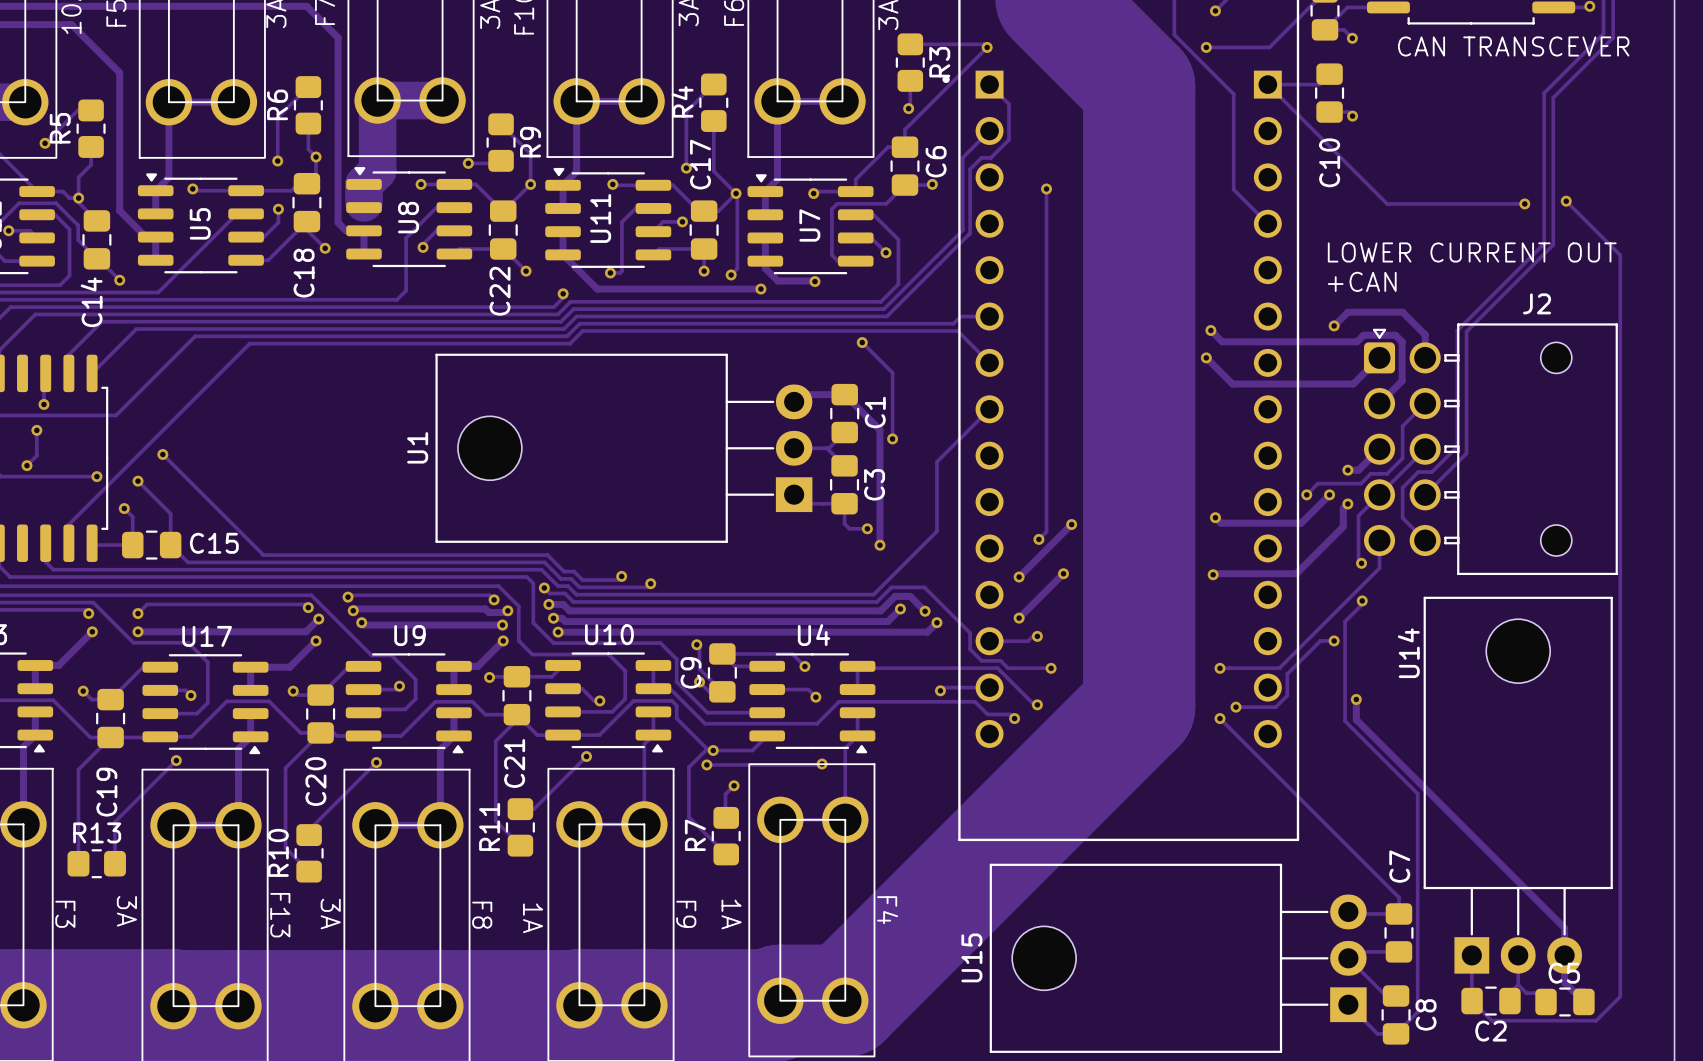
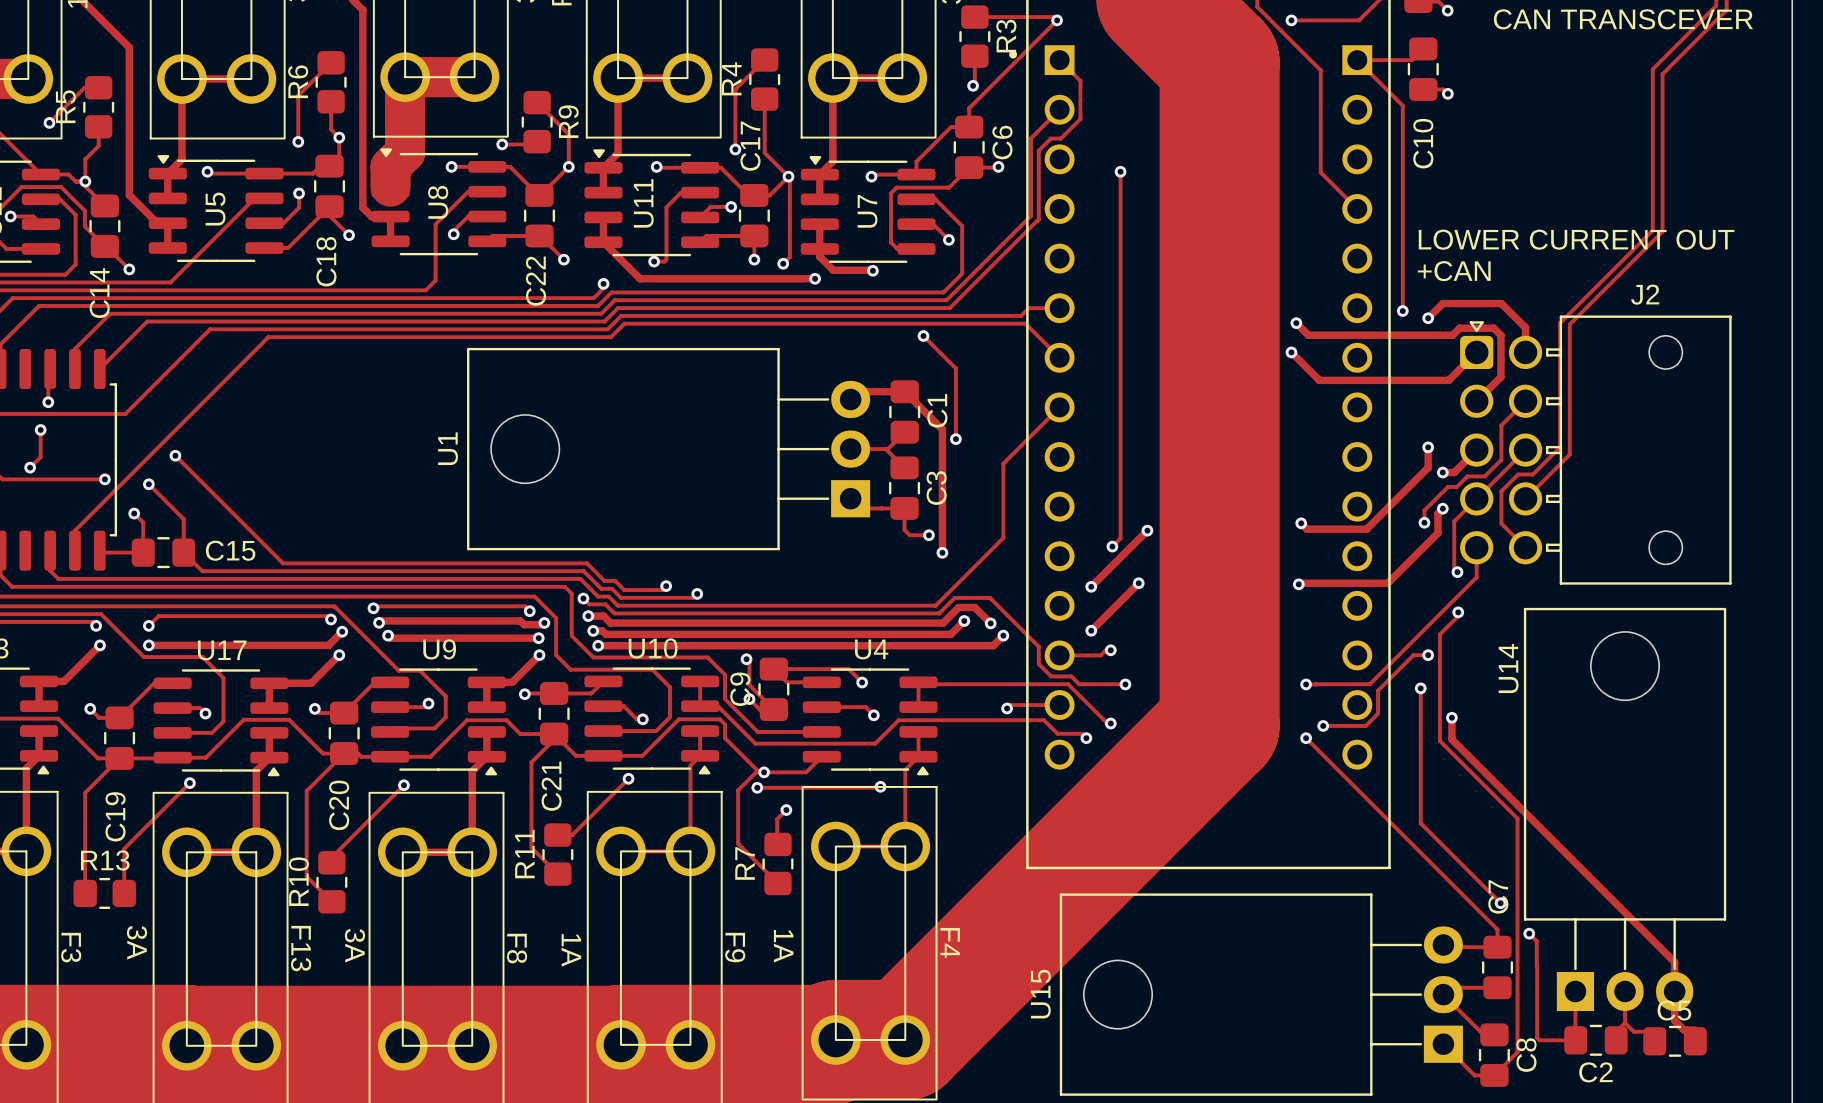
track: (1310, 127) (1387, 203) (1524, 203) -> (1402, 105) (1402, 311)
track: (1566, 201) (1620, 255) (1620, 996) (1596, 1020) (1491, 1020) (1472, 1001) -> (1529, 933) (1536, 941) (1537, 1037) (1539, 1040) (1575, 1040)
via: (1566, 201) -> none
via: (1524, 203) -> none
via: none -> (1402, 311)
via: none -> (1428, 447)
track: (1352, 483) (1317, 483) (1306, 494) -> (1448, 486) (1424, 510) (1424, 522)
via: (1306, 494) -> none
track: (1329, 494) (1301, 523) (1276, 523) -> (1428, 447) (1428, 467) (1366, 529)
via: (1329, 494) -> none
via: none -> (1424, 522)
track: none -> (1420, 688) (1420, 823) (1500, 903)
via: none -> (1420, 688)
via: none -> (1500, 903)
via: none -> (1529, 933)

